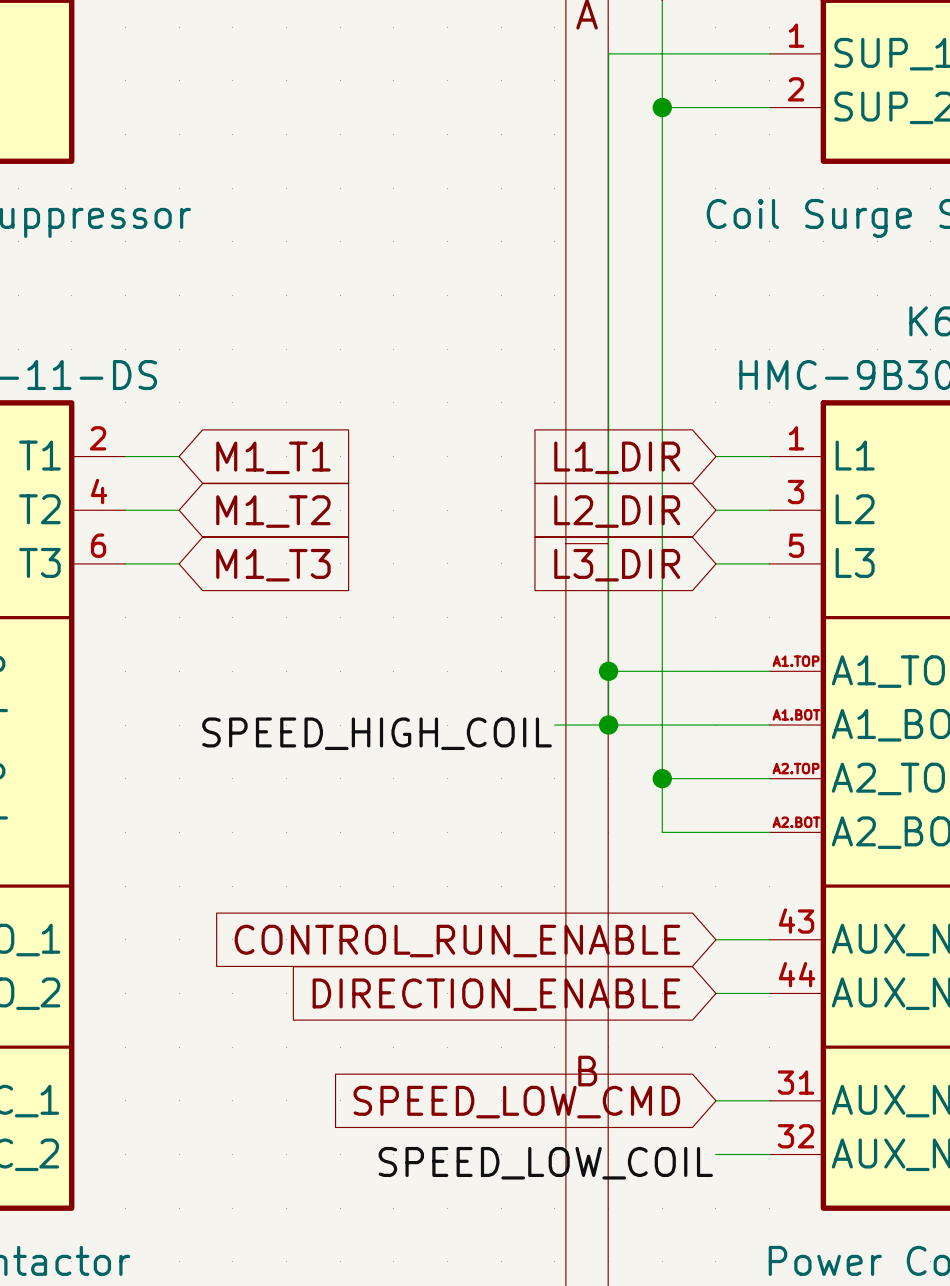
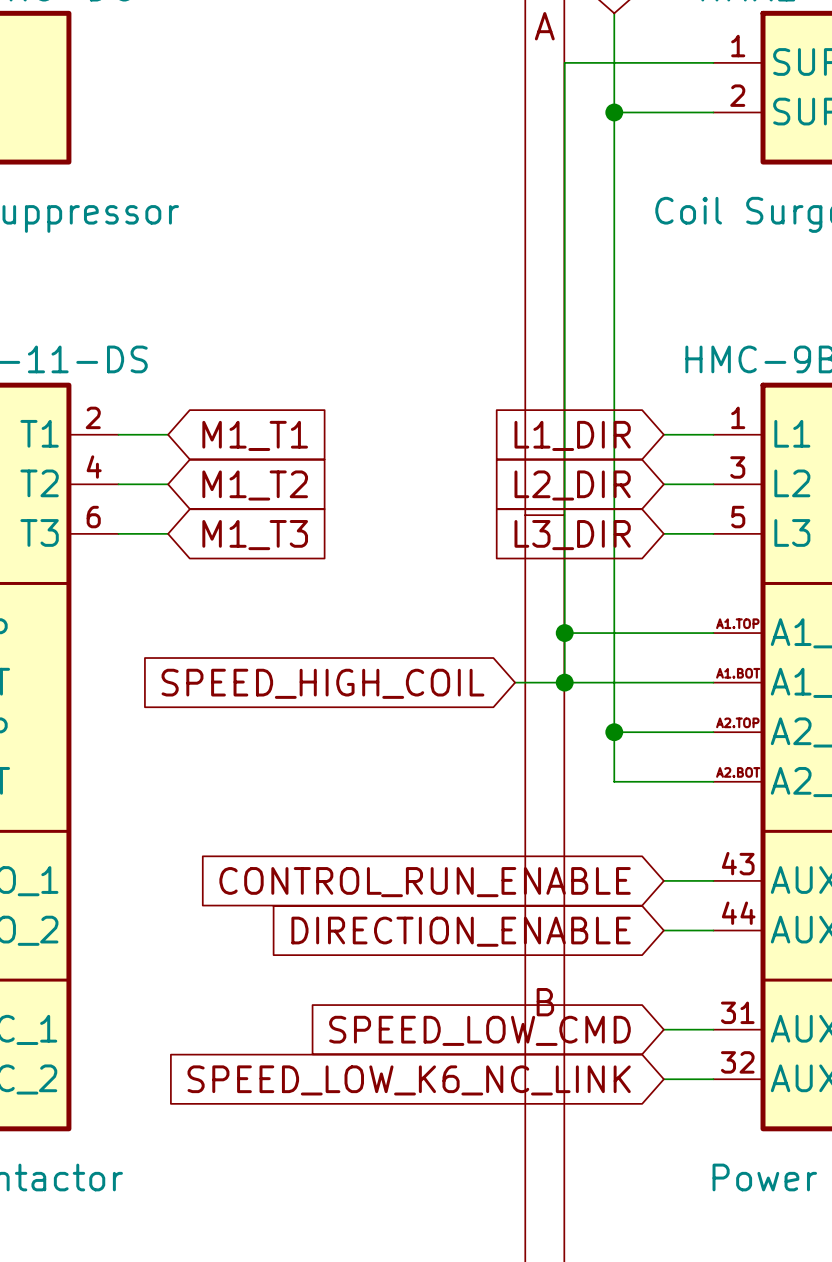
global label: none -> SPEED_HIGH_COIL (322, 683)
label: SPEED_HIGH_COIL (377, 733) -> none
global label: none -> SPEED_LOW_K6_NC_LINK (409, 1080)
label: SPEED_LOW_COIL (545, 1163) -> none

